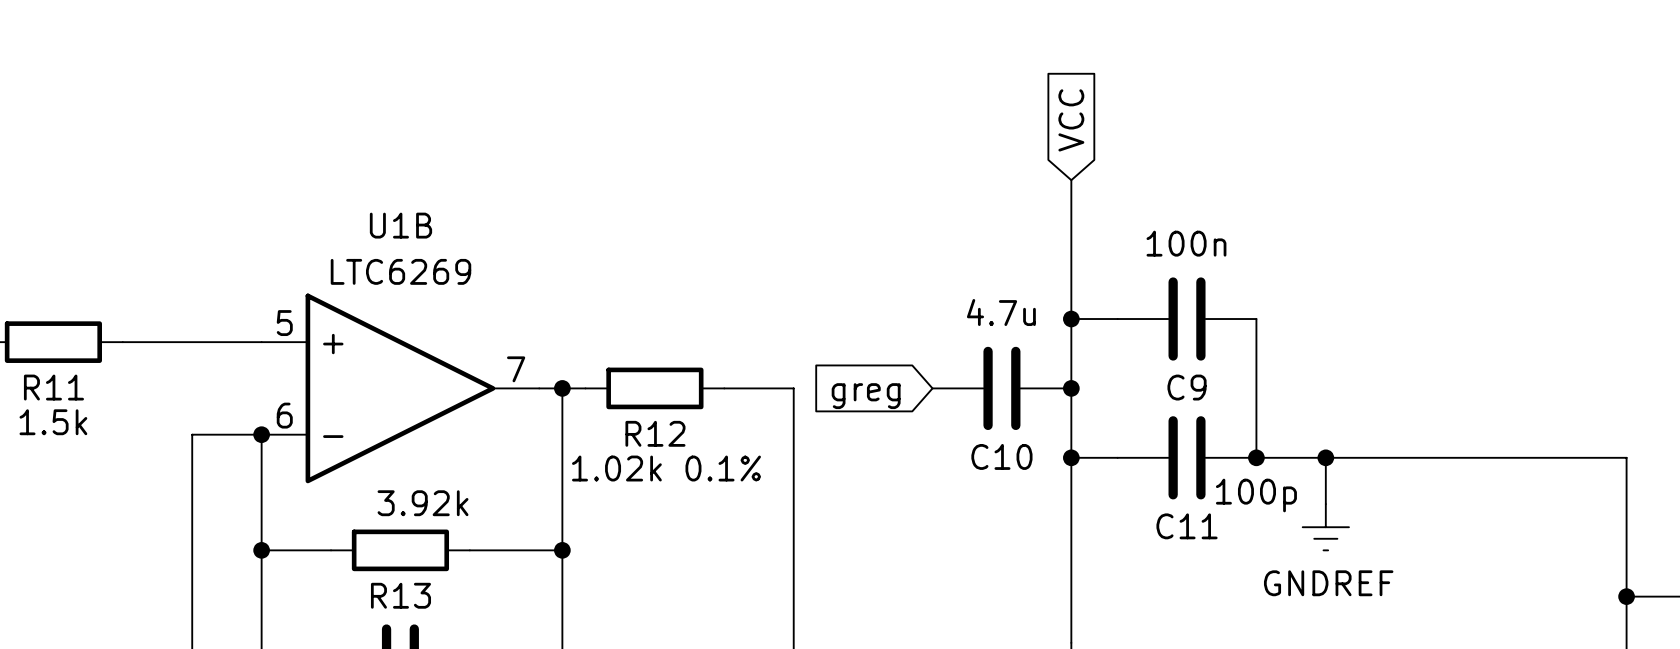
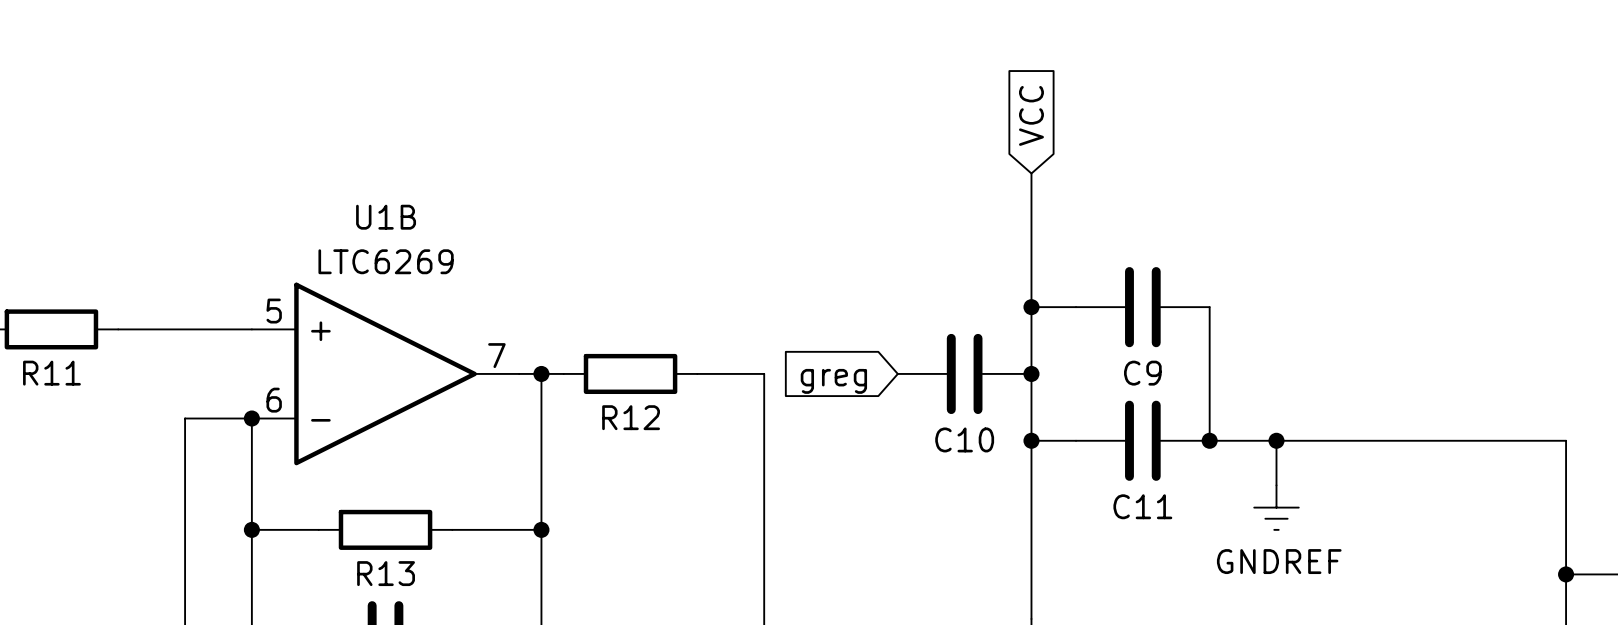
C9 value: 100n (1186, 243) -> none
C10 value: 4.7u (1001, 312) -> none
R11 value: 1.5k (53, 422) -> none
R12 value: 1.02k 0.1% (666, 468) -> none
C11 value: 100p (1256, 495) -> none
R13 value: 3.92k (423, 503) -> none

